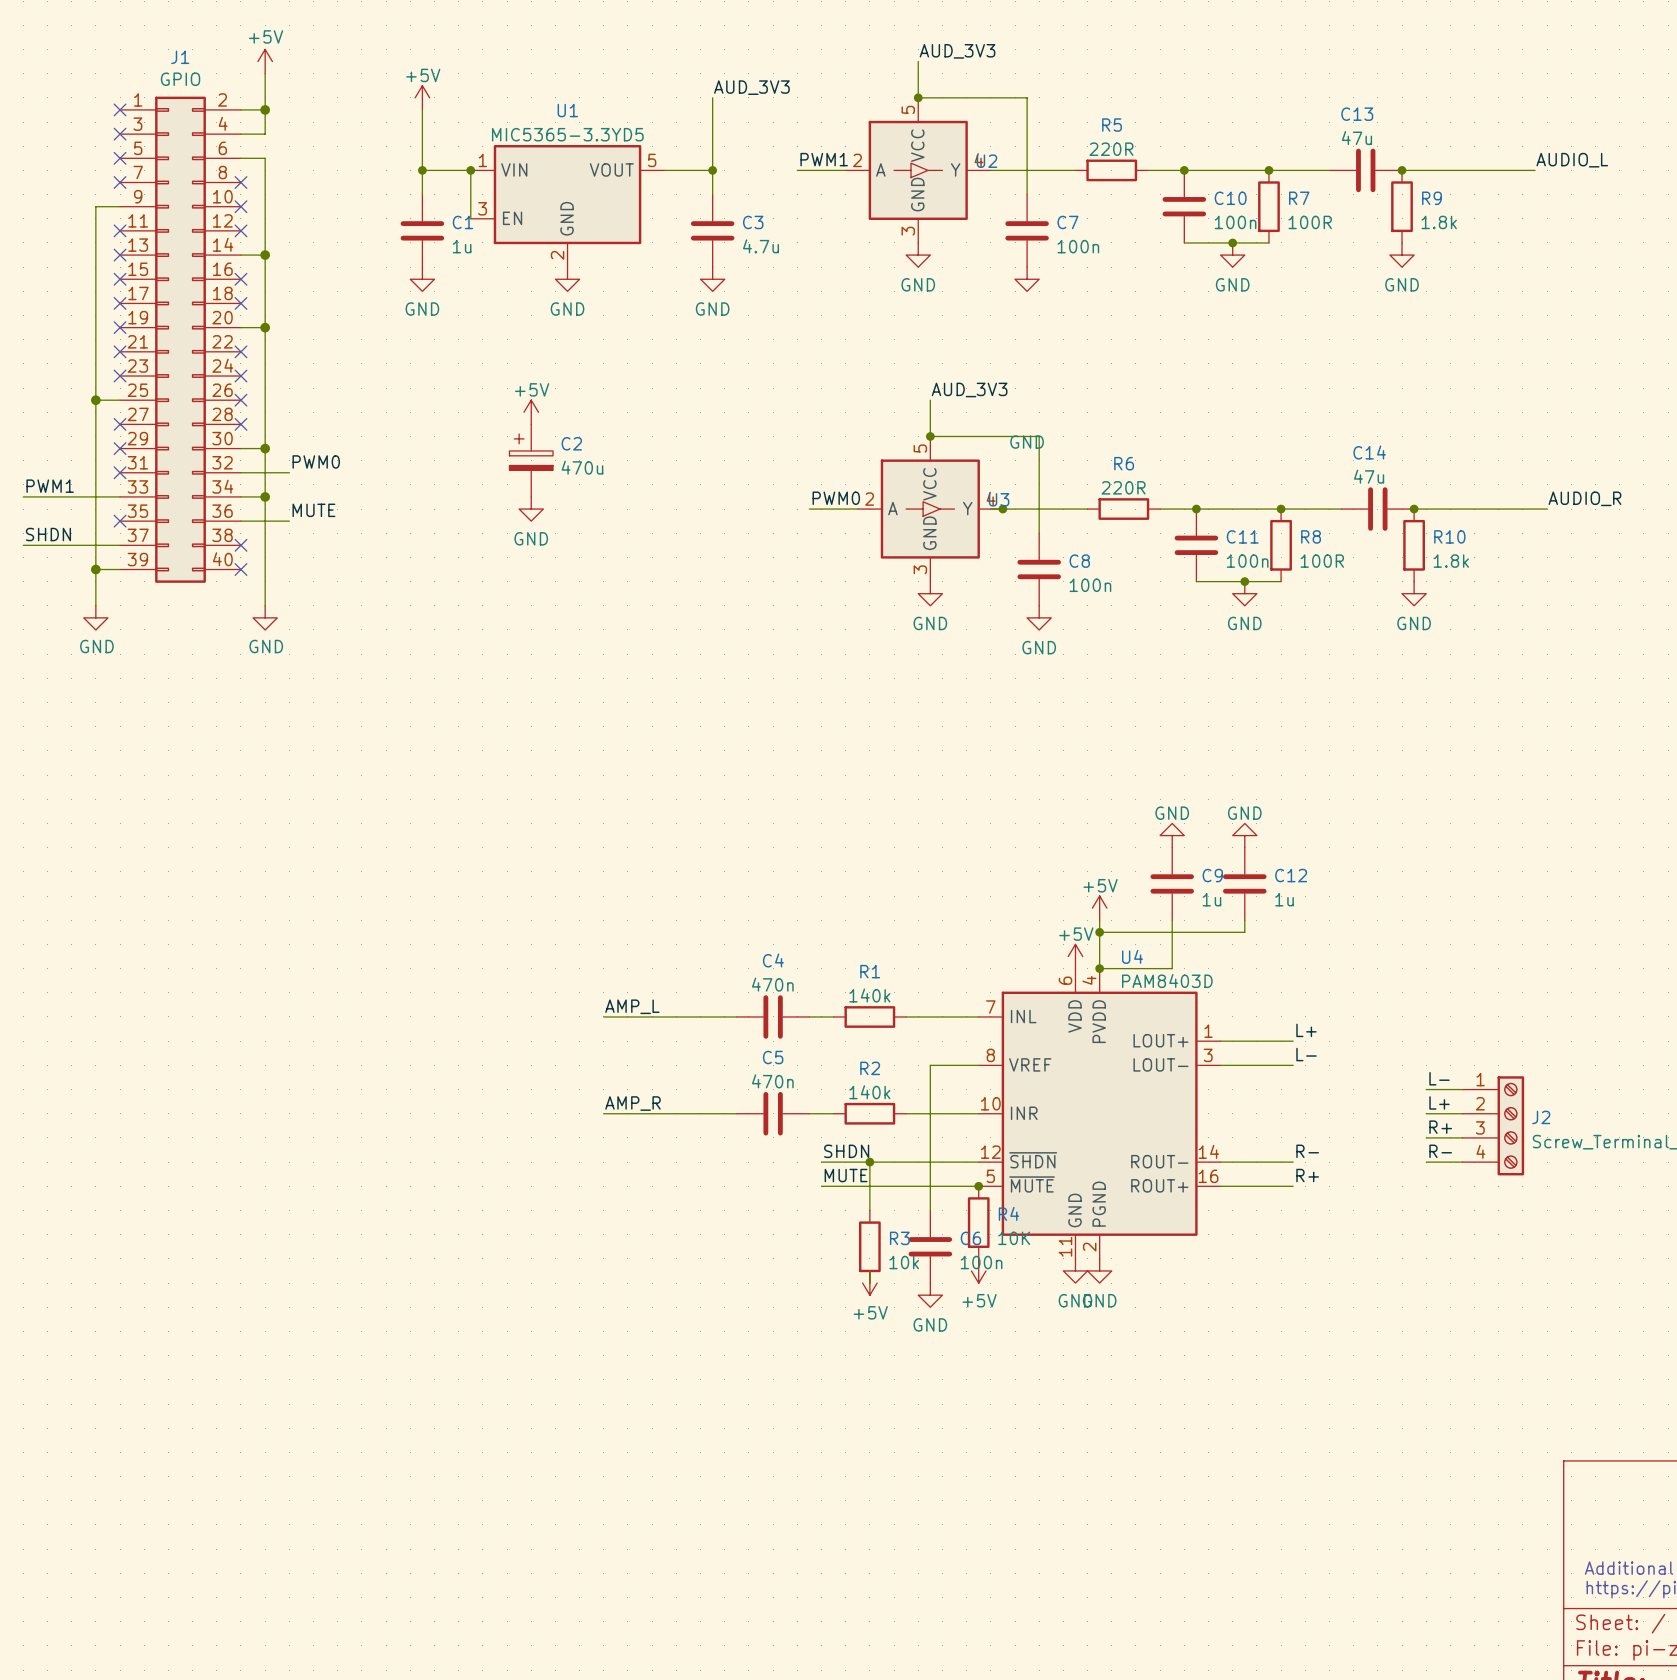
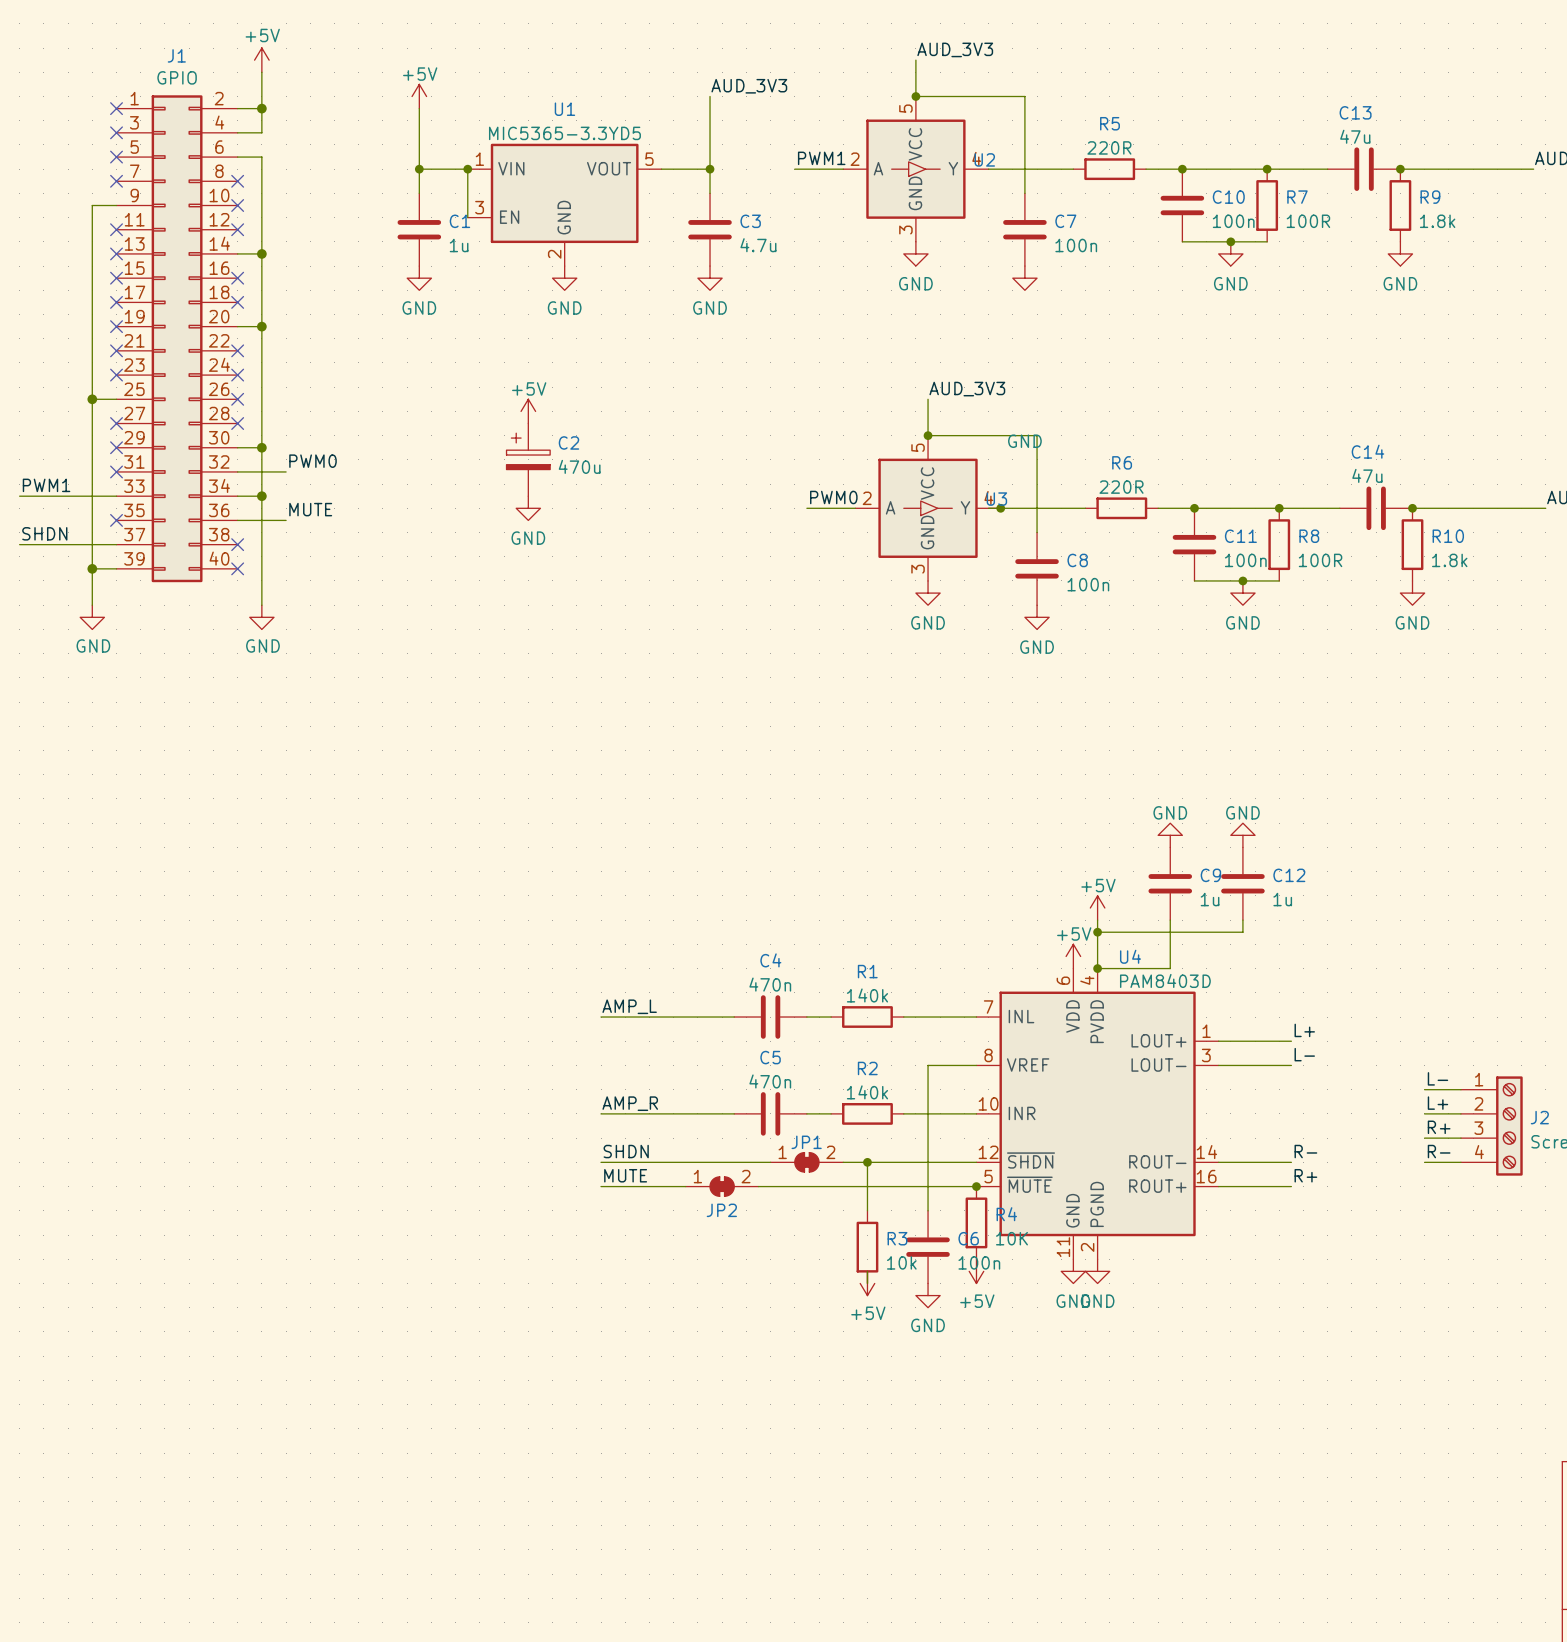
label position: SHDN (846, 1151) -> SHDN (626, 1151)
wire: none -> (601, 1162) (770, 1162)
JP1: none -> (806, 1162)
label position: MUTE (846, 1175) -> MUTE (625, 1175)
wire: none -> (601, 1186) (685, 1186)
JP2: none -> (722, 1186)
wire: none -> (758, 1186) (819, 1186)

